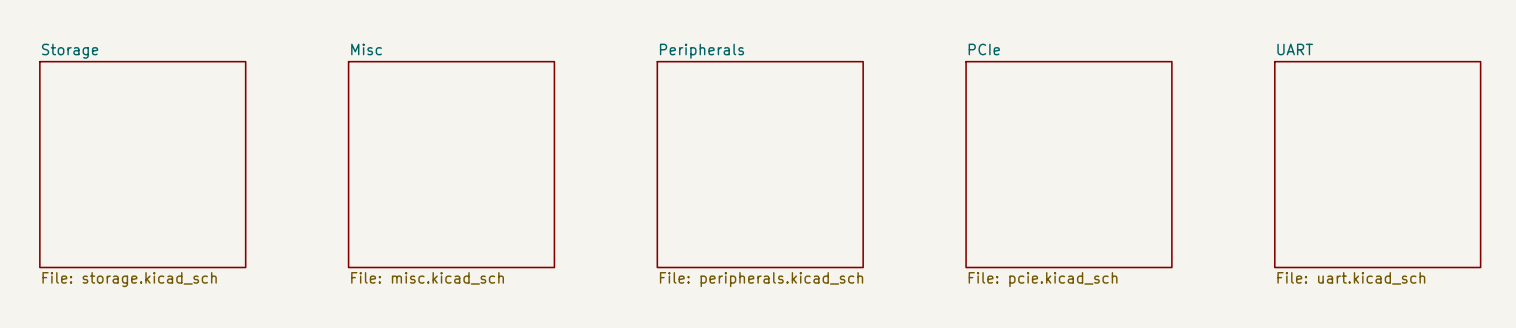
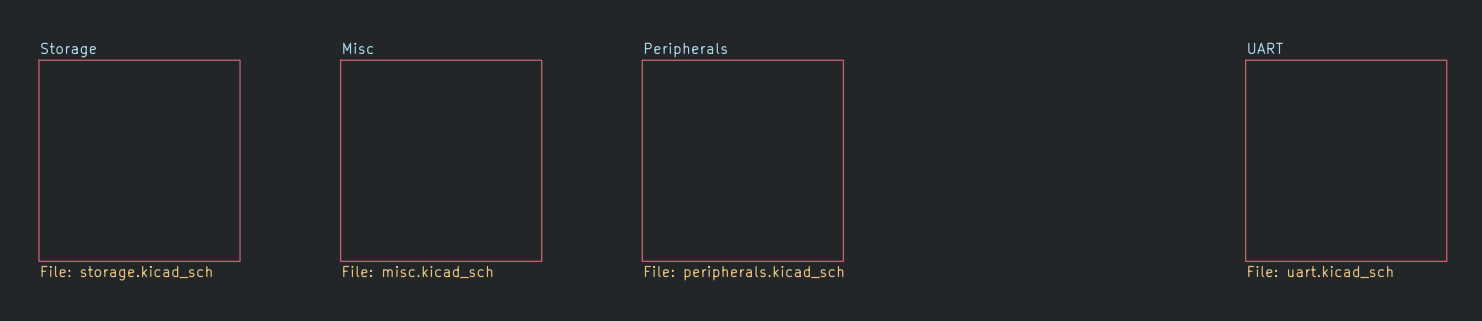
sheet PCIe: File: pcie.kicad_sch (1068, 164) -> none

